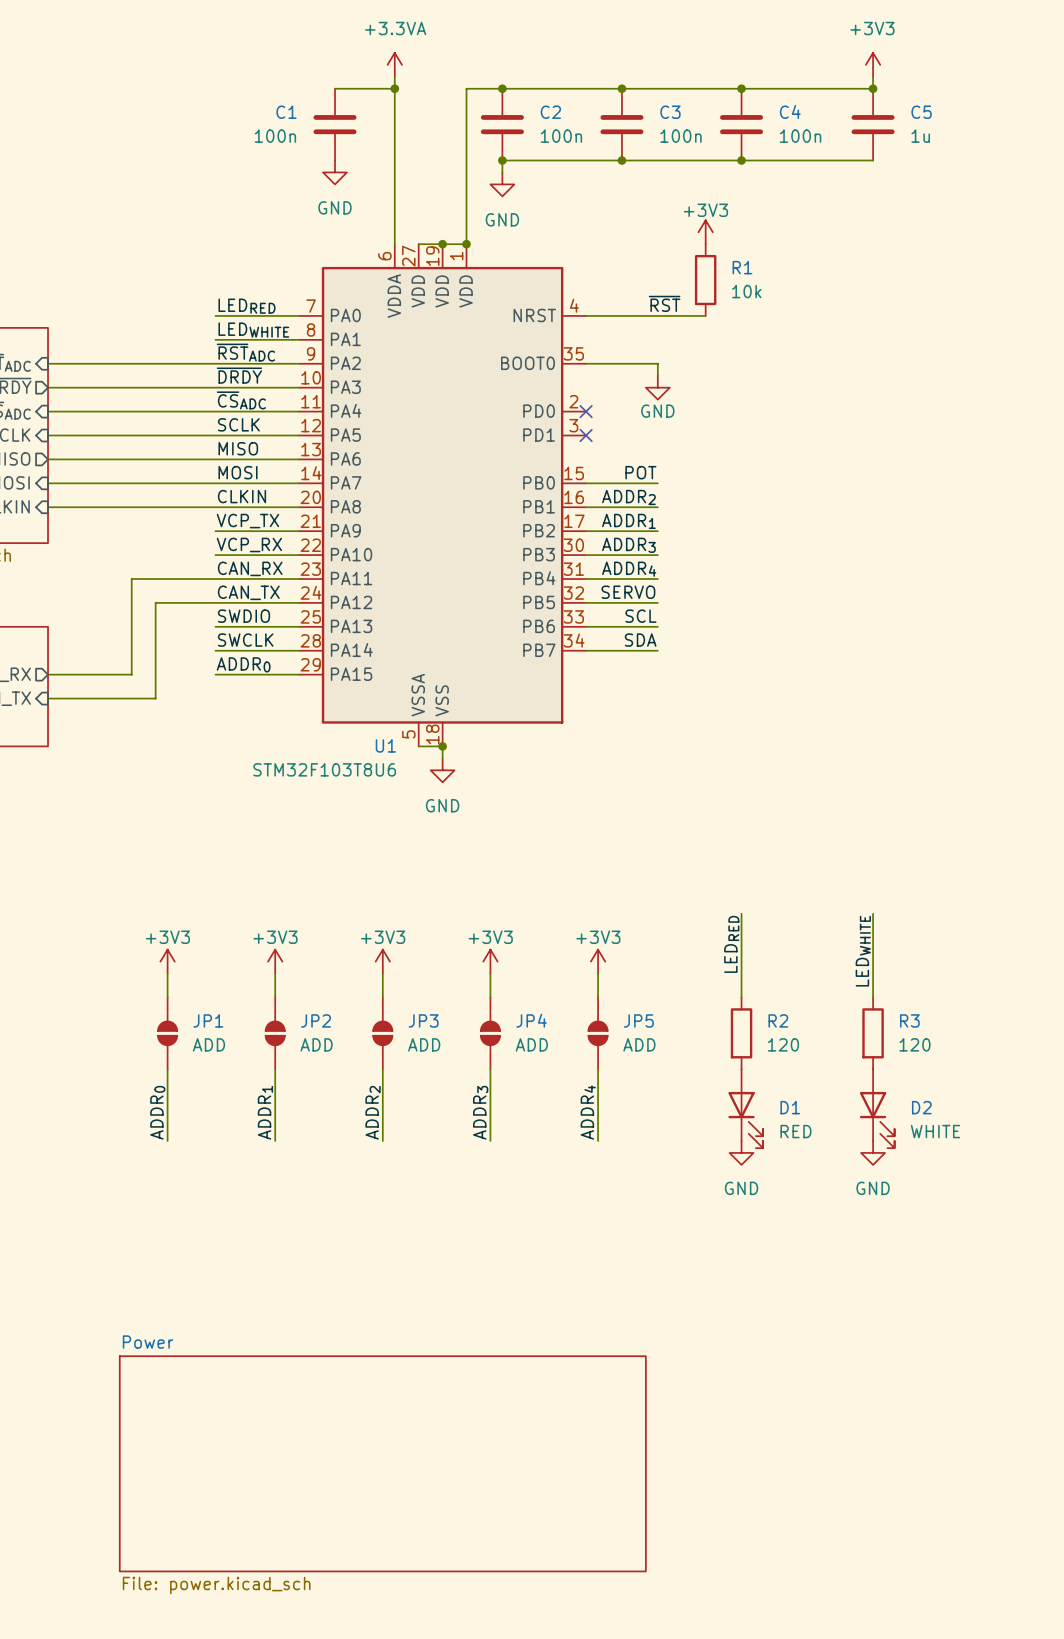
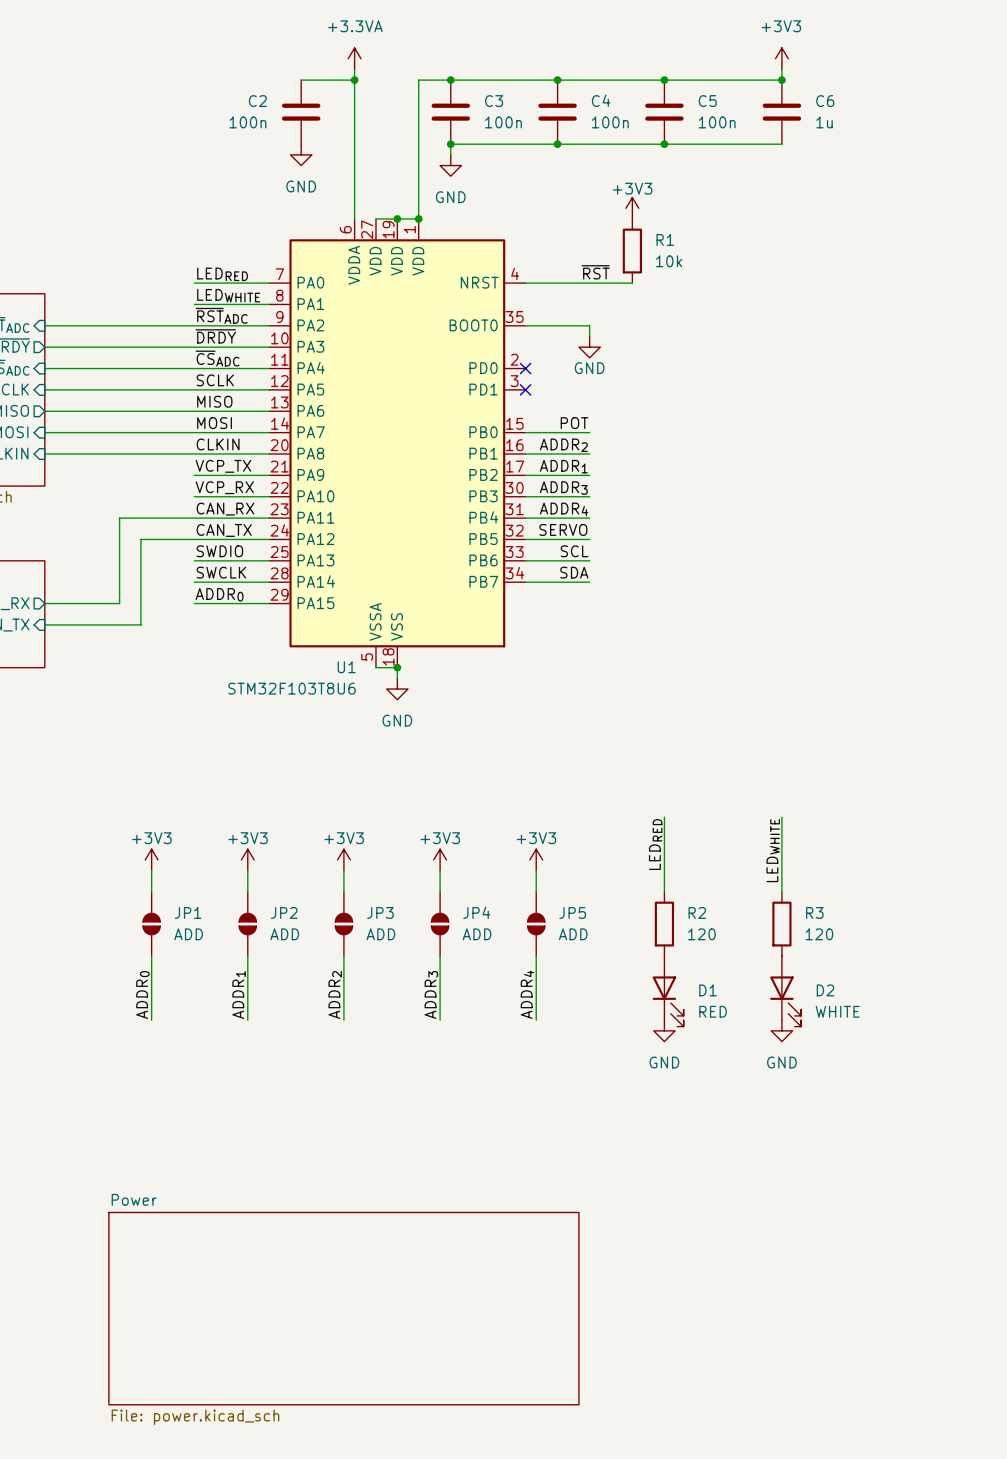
C4 name: C4 (790, 111) -> C5 (707, 101)
C1 name: C1 (286, 112) -> C2 (257, 101)
C2 name: C2 (550, 112) -> C3 (494, 101)
C3 name: C3 (670, 112) -> C4 (601, 100)
C5 name: C5 (921, 112) -> C6 (825, 101)

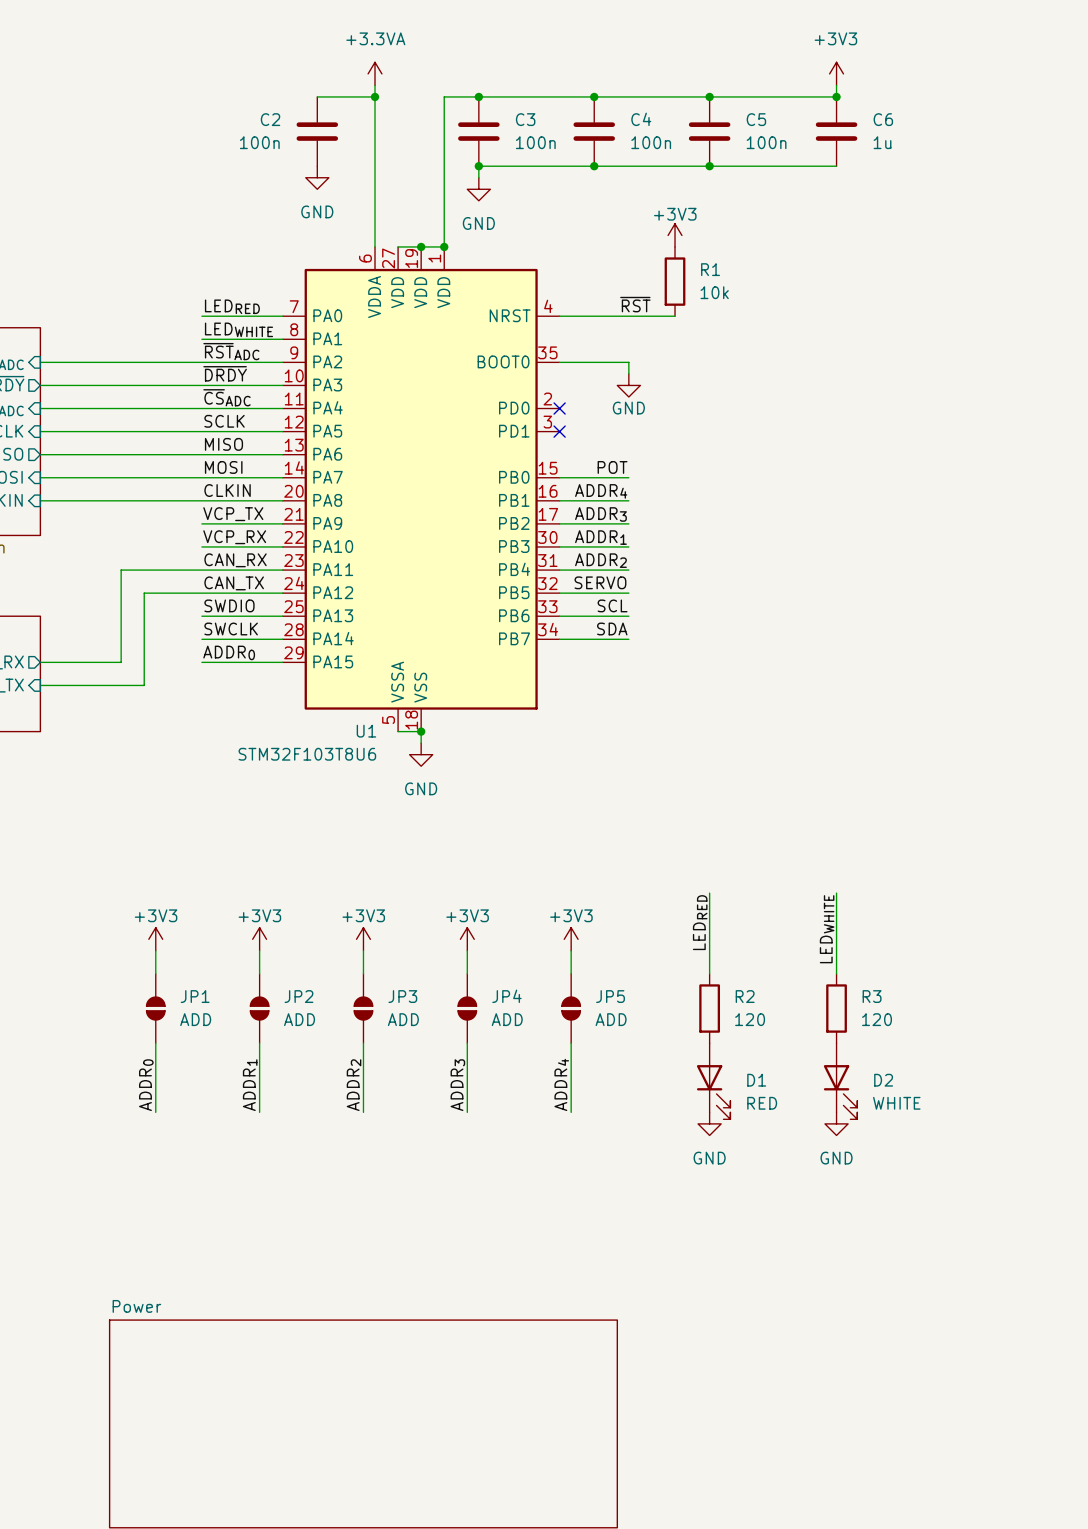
label: ADDR2 (563, 445) -> ADDR4 (601, 491)
label: ADDR1 (563, 466) -> ADDR3 (600, 514)
label: ADDR3 (563, 488) -> ADDR1 (600, 537)
label: ADDR4 (564, 509) -> ADDR2 (600, 560)

